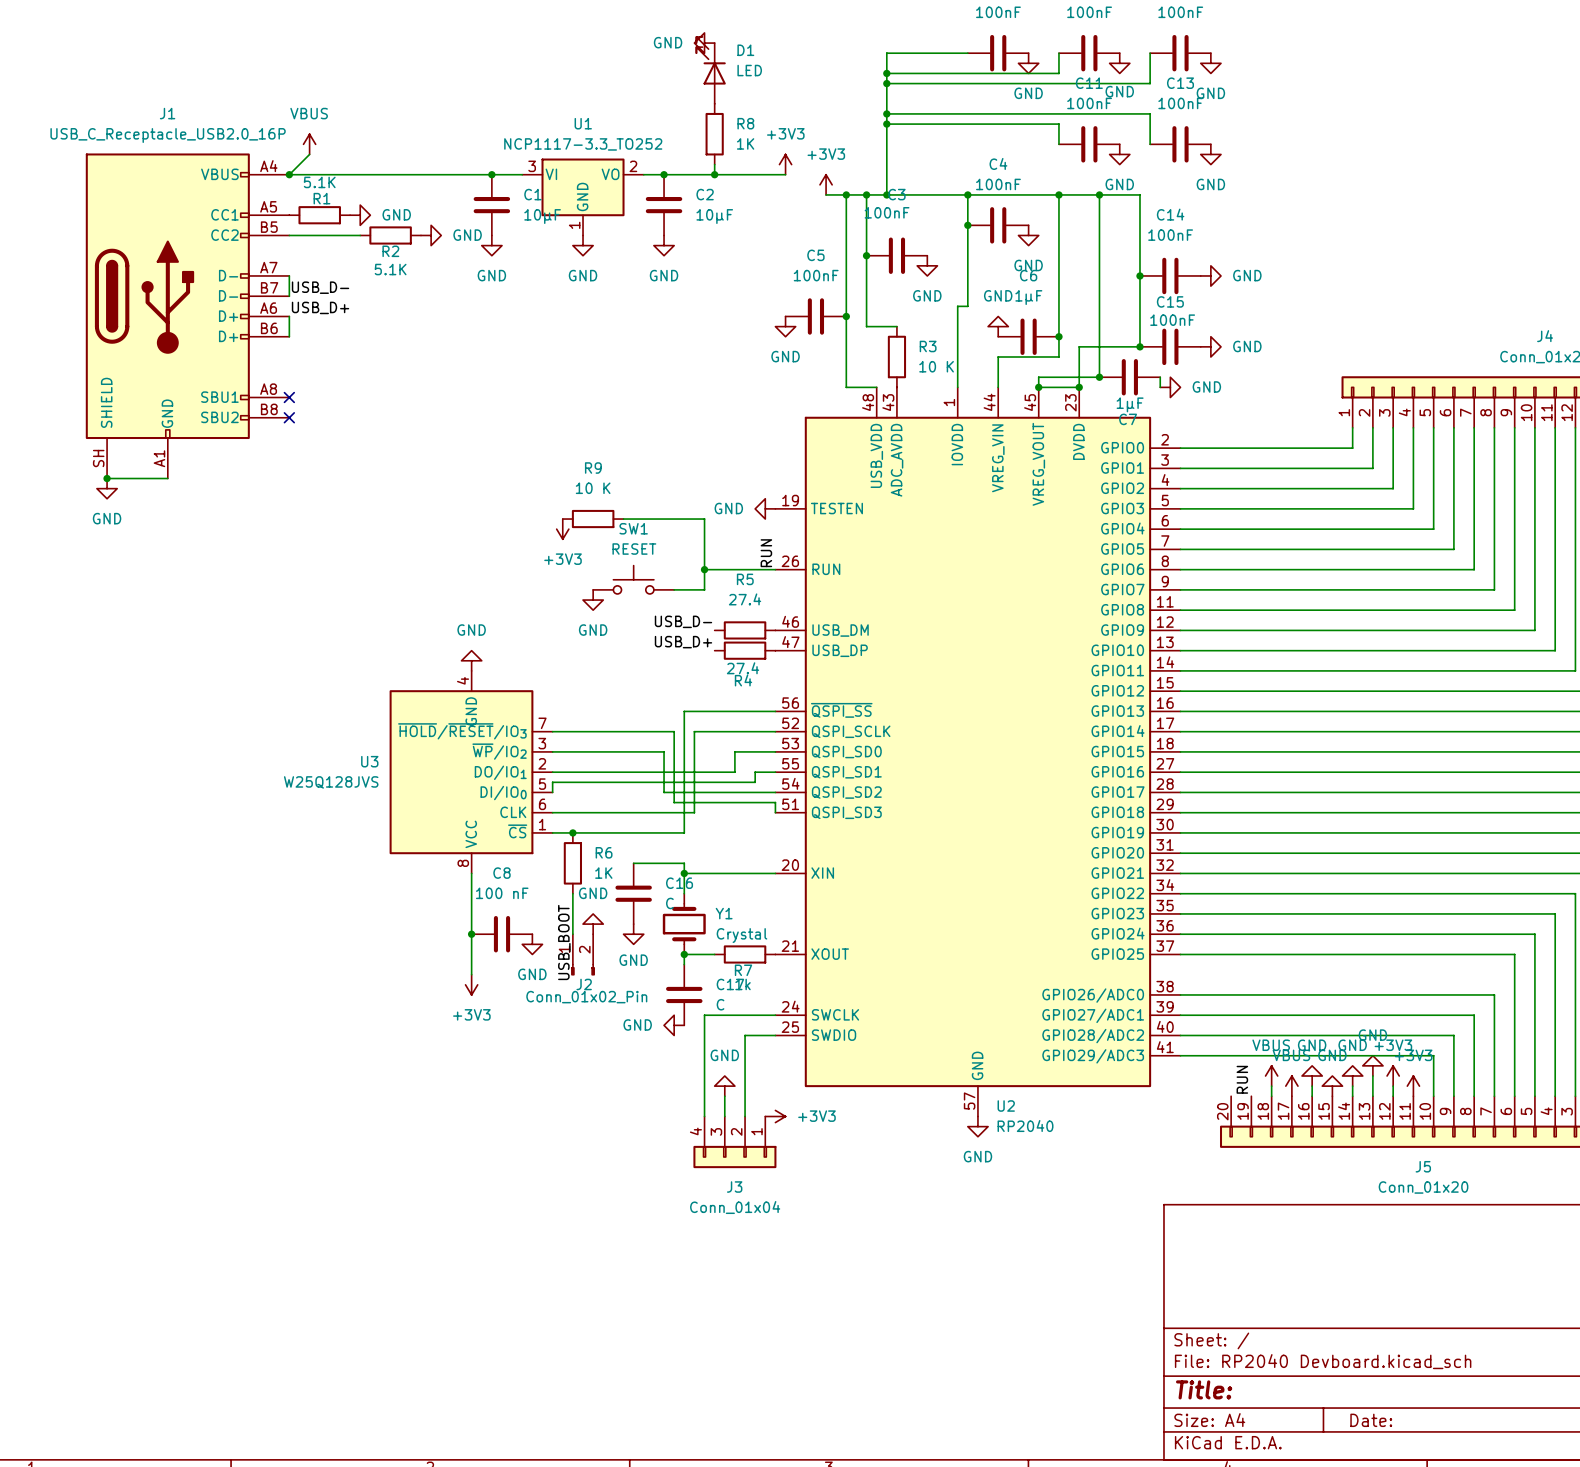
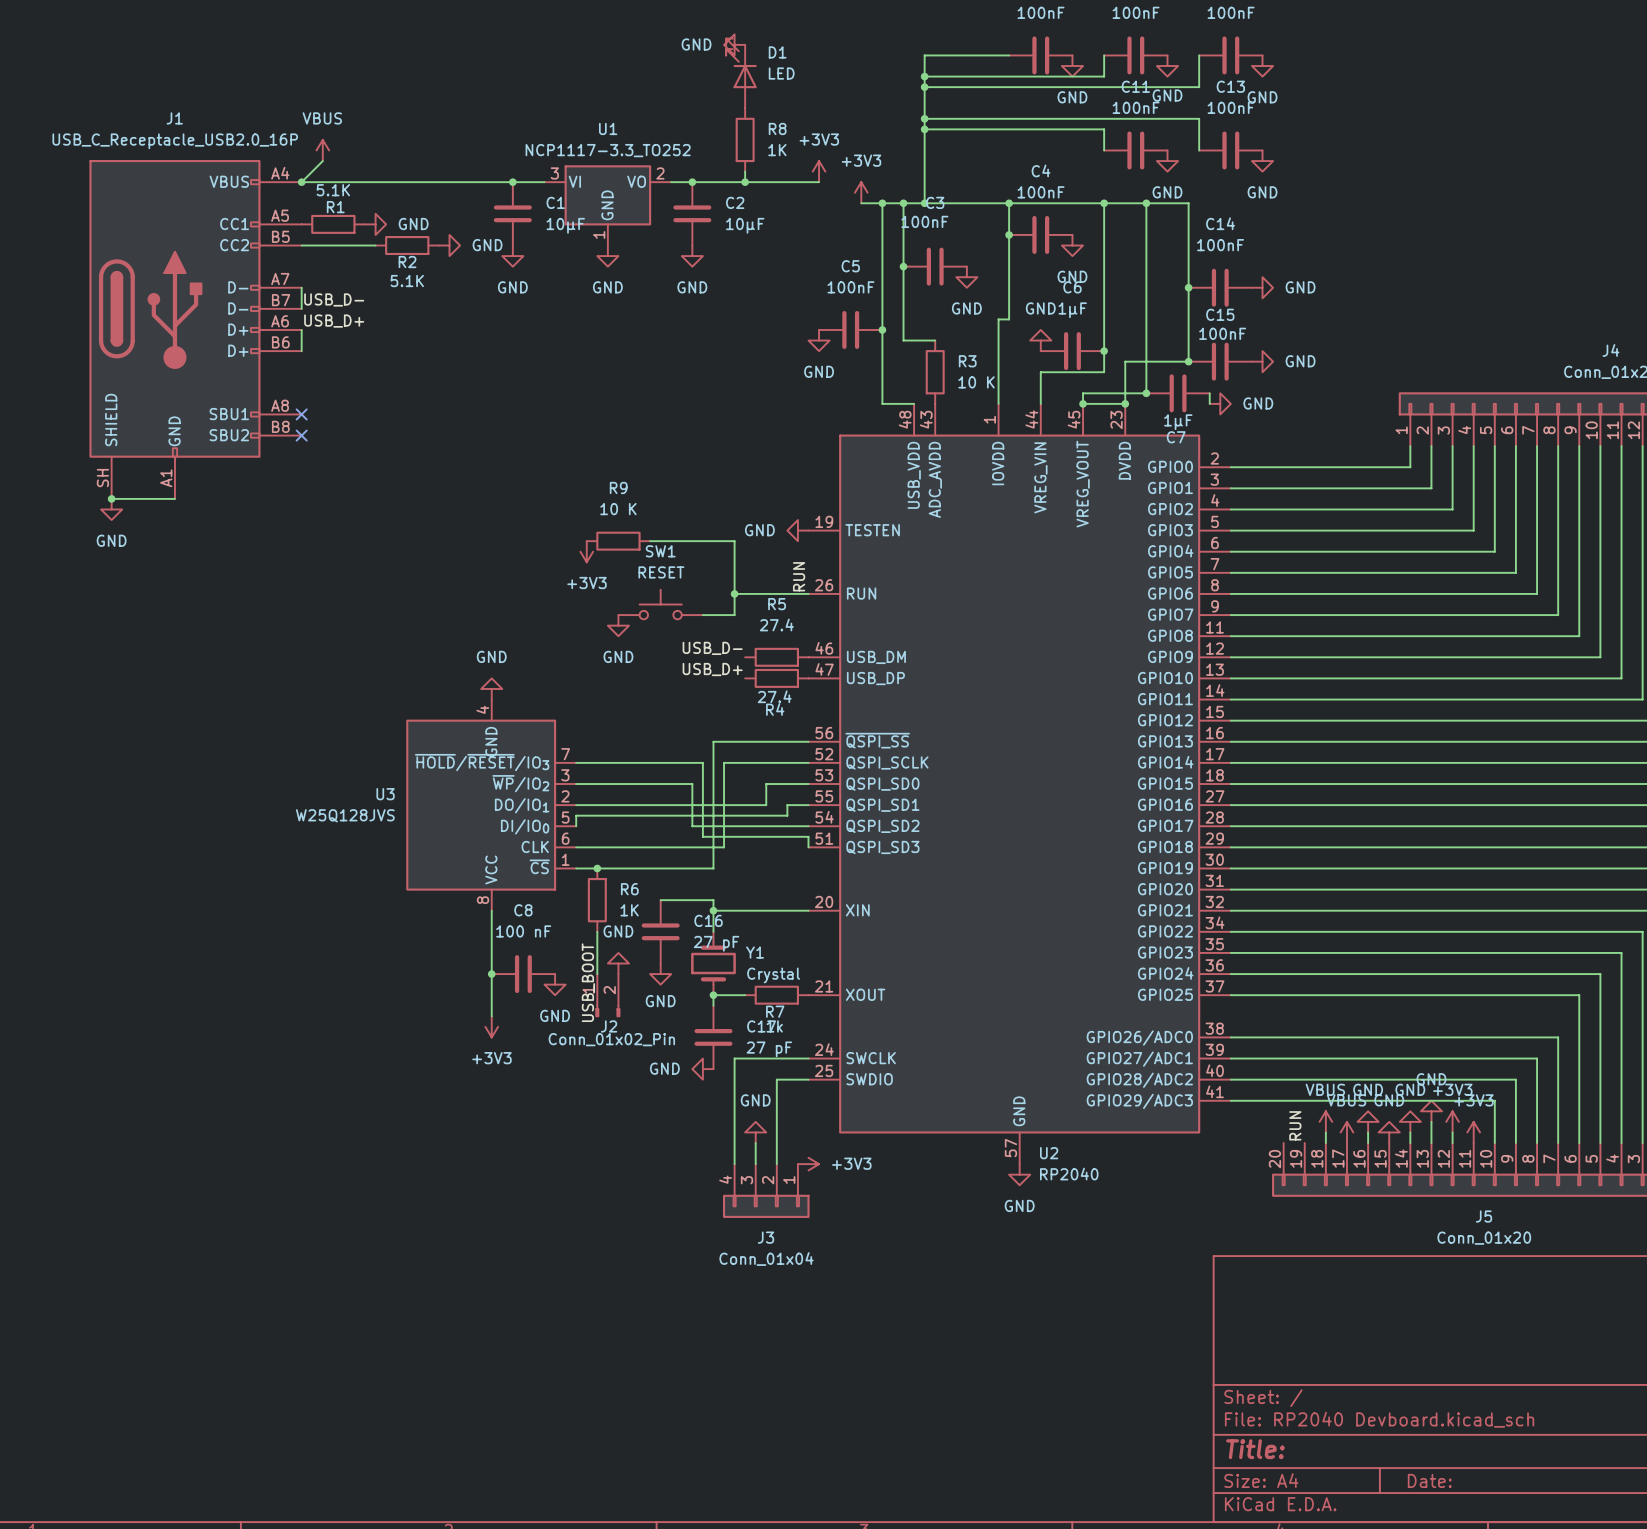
C16 value: C (669, 903) -> 27 pF (716, 943)
C17 value: C (720, 1004) -> 27 pF (769, 1049)

